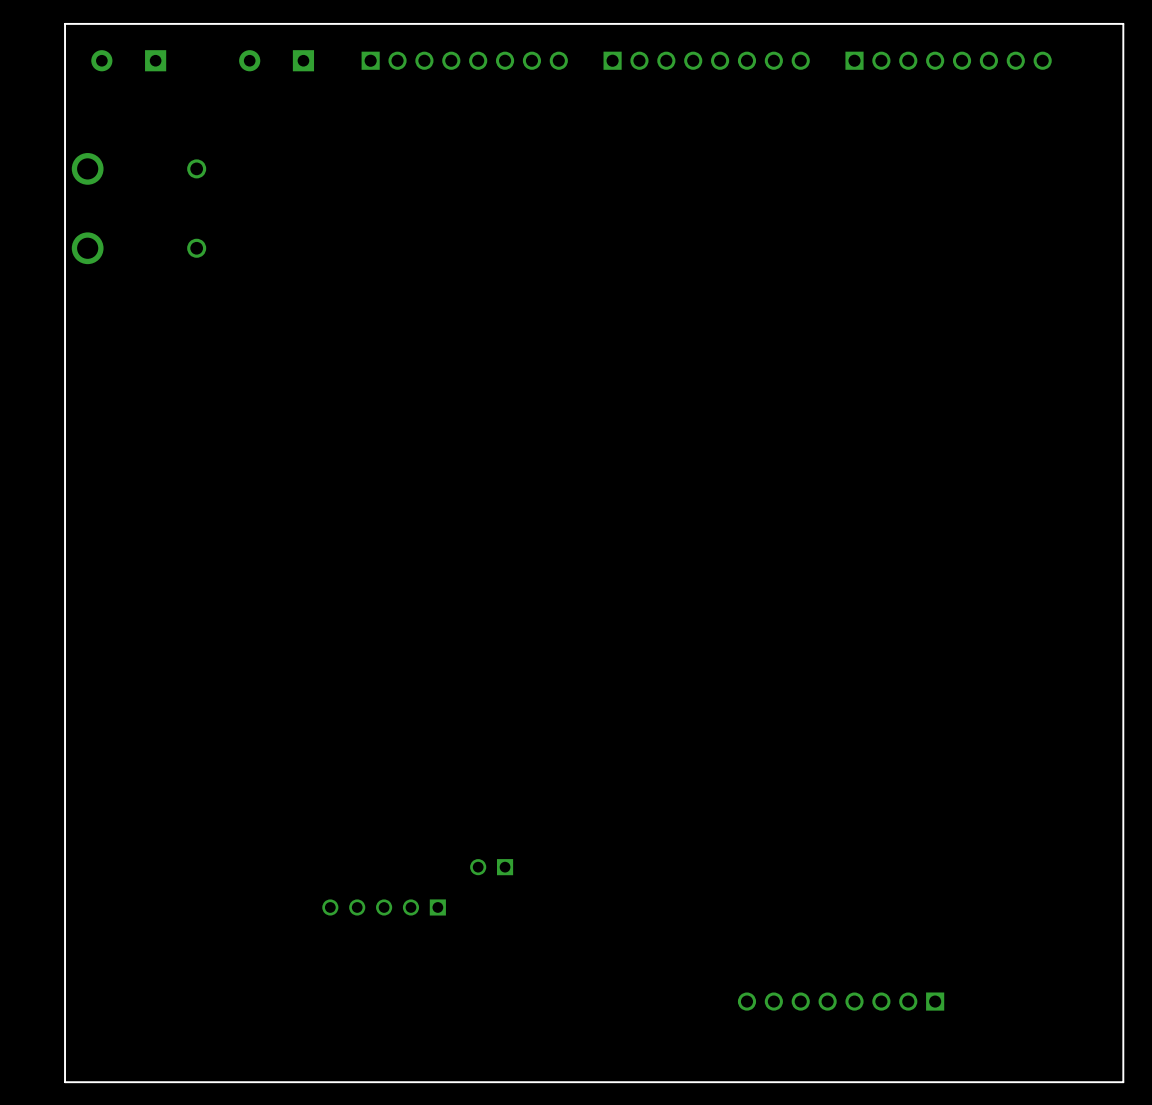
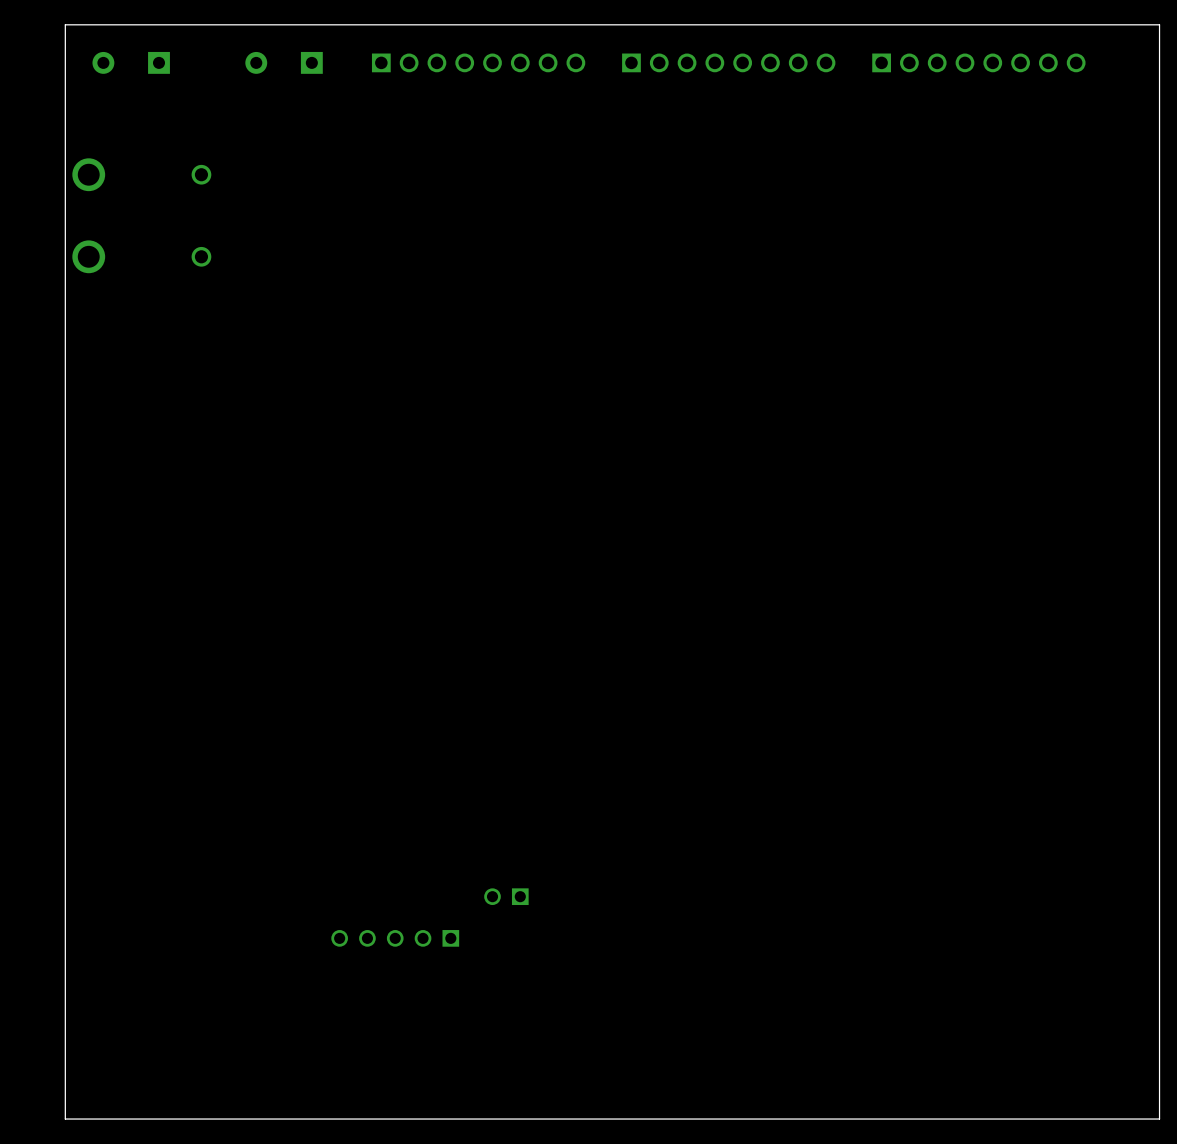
part: (841, 1001) -> none

